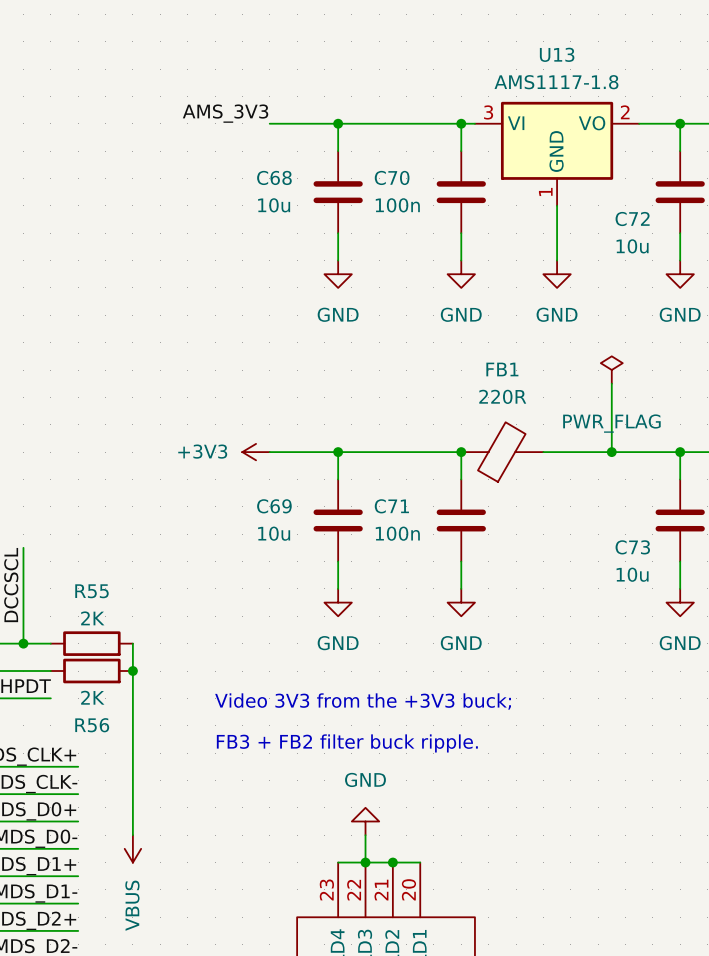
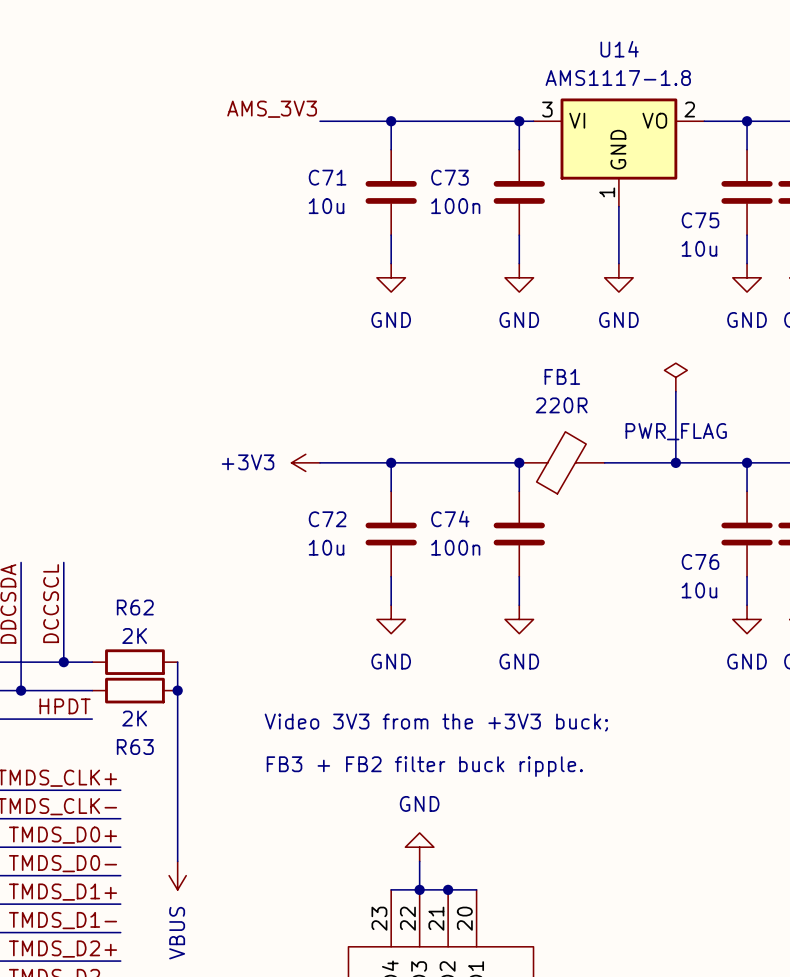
U13 name: U13 (557, 54) -> U14 (619, 49)
C68 name: C68 (274, 177) -> C71 (327, 177)
C70 name: C70 (392, 177) -> C73 (449, 177)
C72 name: C72 (632, 219) -> C75 (700, 220)
C69 name: C69 (274, 506) -> C72 (327, 519)
C71 name: C71 (391, 506) -> C74 (450, 518)
C73 name: C73 (632, 547) -> C76 (700, 561)
R55 name: R55 (91, 591) -> R62 (135, 607)
R56 name: R56 (92, 725) -> R63 (135, 747)

